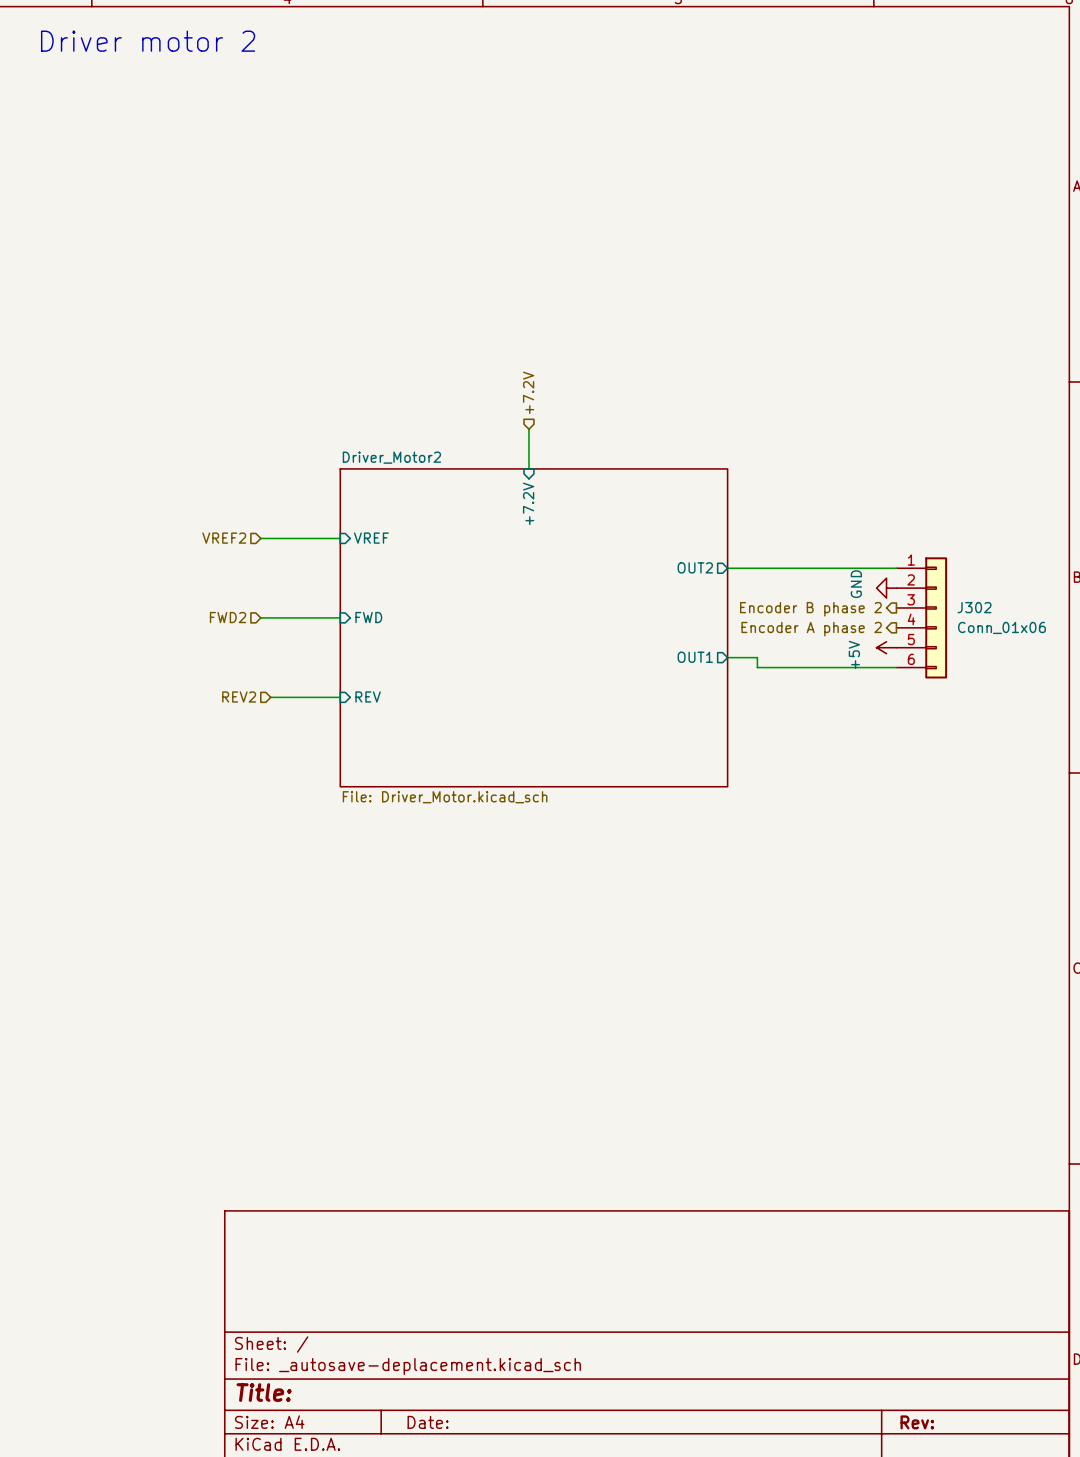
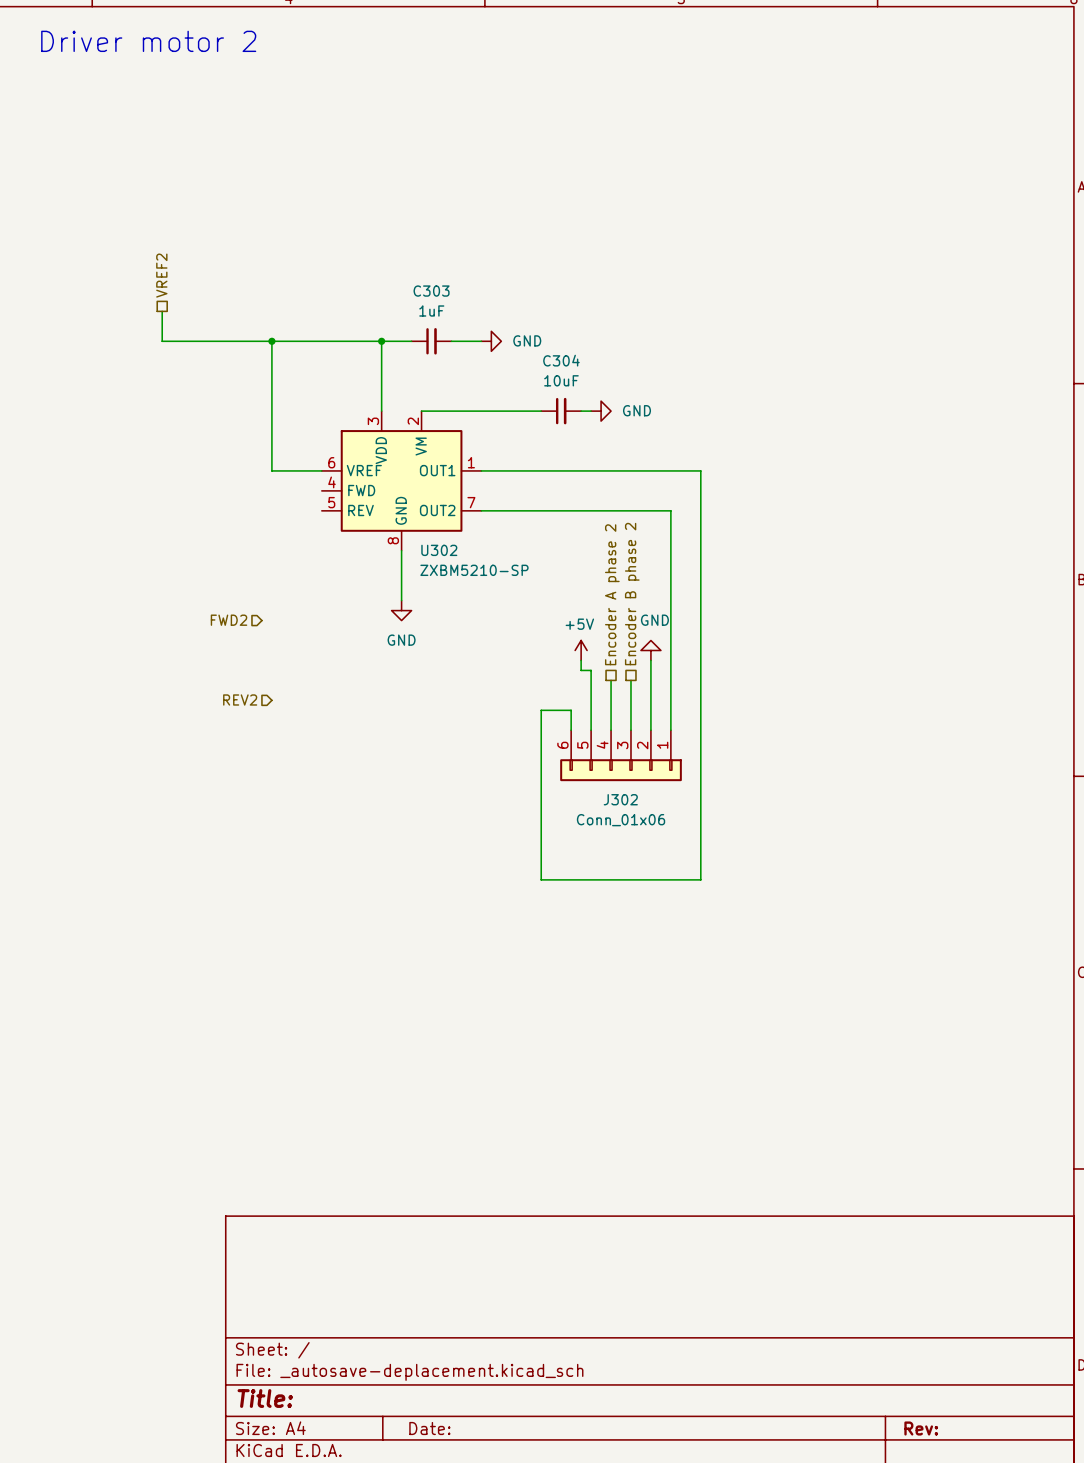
hierarchical label: none -> VREF2 (161, 275)
wire: none -> (162, 311) (162, 341) (411, 341)
wire: none -> (271, 341) (271, 470) (321, 470)
junction: none -> (271, 341)
wire: none -> (381, 341) (381, 411)
junction: none -> (381, 341)
C303: none -> 1uF (431, 341)
wire: none -> (451, 341) (481, 341)
power symbol: none -> GND (491, 341)
hierarchical label: +7.2V (528, 392) -> none
wire: none -> (421, 411) (541, 411)
C304: none -> 10uF (561, 411)
wire: none -> (581, 411) (591, 411)
power symbol: none -> GND (601, 411)
wire: (528, 429) (528, 468) -> none
wire: none -> (481, 470) (700, 470) (700, 879) (541, 879) (541, 710) (571, 710) (571, 730)
U302: none -> ZXBM5210-SP (401, 480)
sheet pin: +7.2V (528, 503) -> none
wire: none -> (481, 510) (670, 510) (670, 730)
hierarchical label: VREF2 (224, 538) -> none
wire: (260, 538) (340, 538) -> none
sheet pin: VREF (371, 538) -> none
wire: none -> (401, 550) (401, 600)
sheet pin: OUT2 (695, 567) -> none
wire: (727, 568) (896, 568) -> none
power symbol: GND (886, 588) -> none
hierarchical label: none -> Encoder B phase 2 (632, 594)
hierarchical label: none -> Encoder A phase 2 (612, 594)
power symbol: none -> GND (401, 610)
hierarchical label: Encoder B phase 2 (810, 609) -> none
wire: (260, 617) (340, 617) -> none
sheet pin: FWD (368, 617) -> none
J302 position: (921, 617) -> (621, 755)
J302 rotation: 0° (936, 617) -> 90° clockwise (621, 770)
sheet Driver_Motor2: File: Driver_Motor.kicad_sch (533, 627) -> none
J302 value position: Conn_01x06 (1001, 627) -> Conn_01x06 (621, 820)
hierarchical label: Encoder A phase 2 (811, 629) -> none
power symbol: none -> +5V (581, 650)
power symbol: none -> GND (650, 650)
power symbol: +5V (886, 647) -> none
wire: none -> (581, 660) (581, 670) (591, 670) (591, 730)
wire: none -> (650, 660) (650, 730)
sheet pin: OUT1 (695, 657) -> none
wire: (727, 657) (757, 657) (757, 667) (896, 667) -> none
wire: none -> (611, 680) (611, 730)
wire: none -> (630, 680) (630, 730)
sheet pin: REV (368, 696) -> none
wire: (270, 697) (340, 697) -> none

